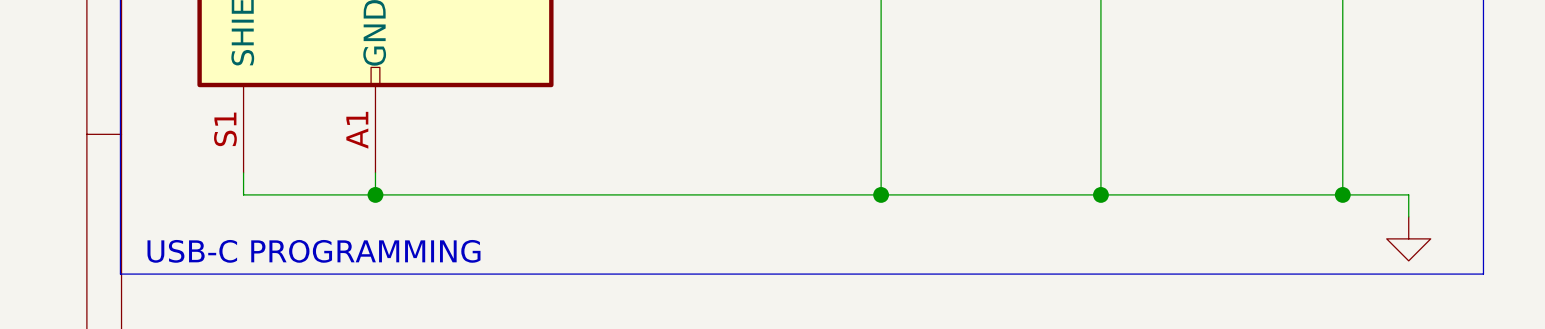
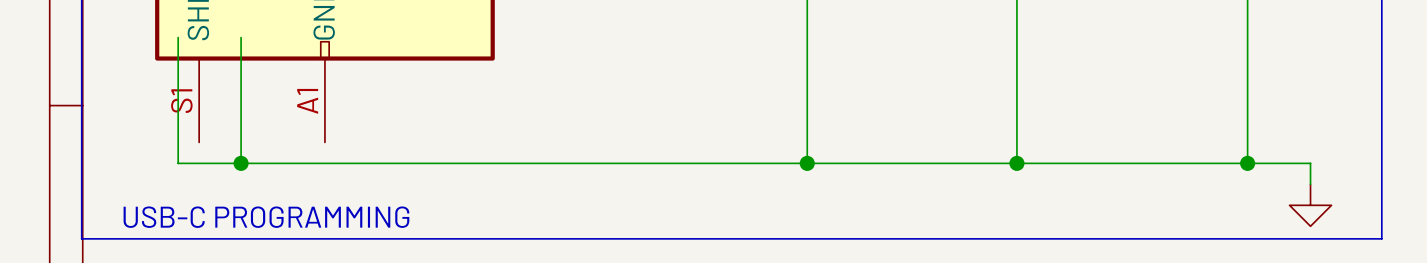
wire: none -> (241, 37) (241, 163)
wire: (243, 172) (243, 194) -> (178, 37) (178, 163) (199, 163)
wire: (375, 172) (375, 194) -> none
junction position: (375, 194) -> (241, 163)

